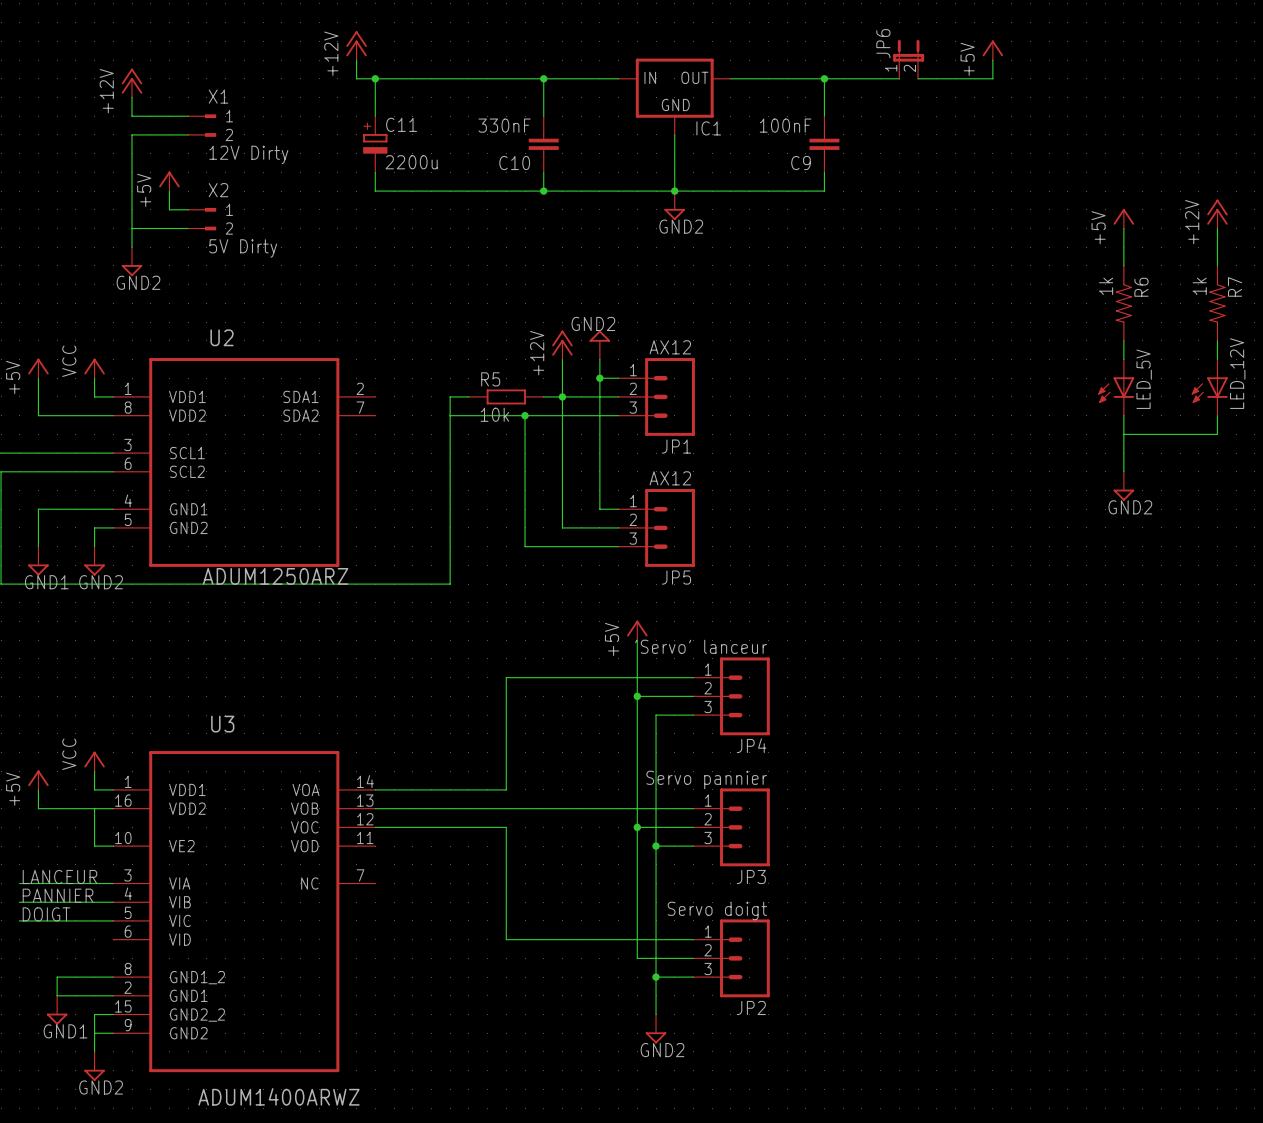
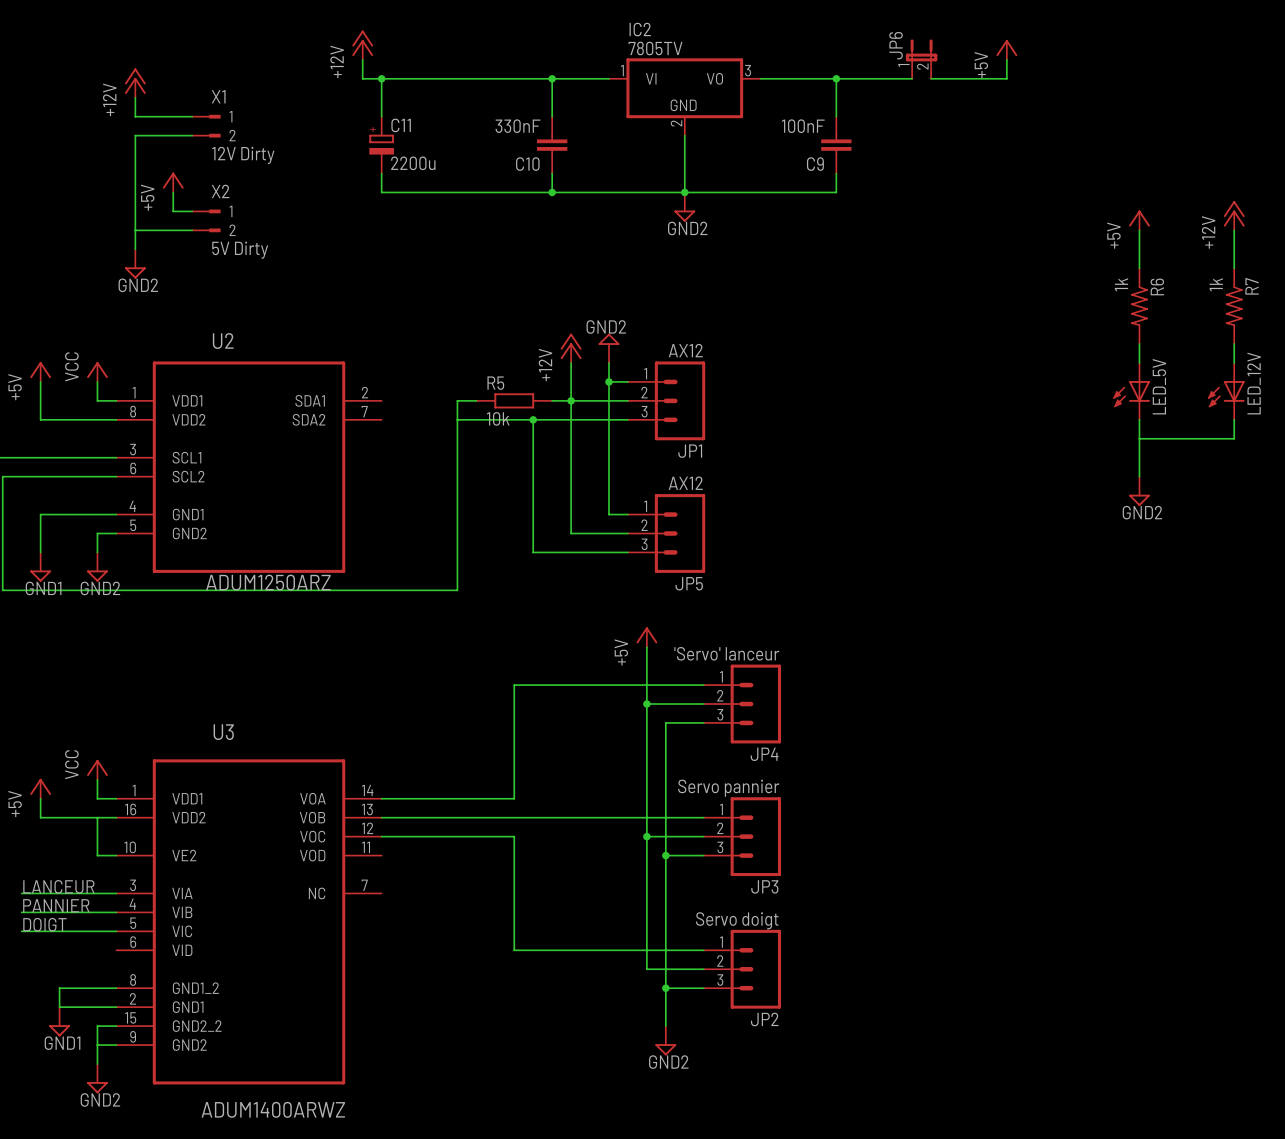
IC1: (674, 96) -> none
IC2: none -> 7805TV (684, 96)

